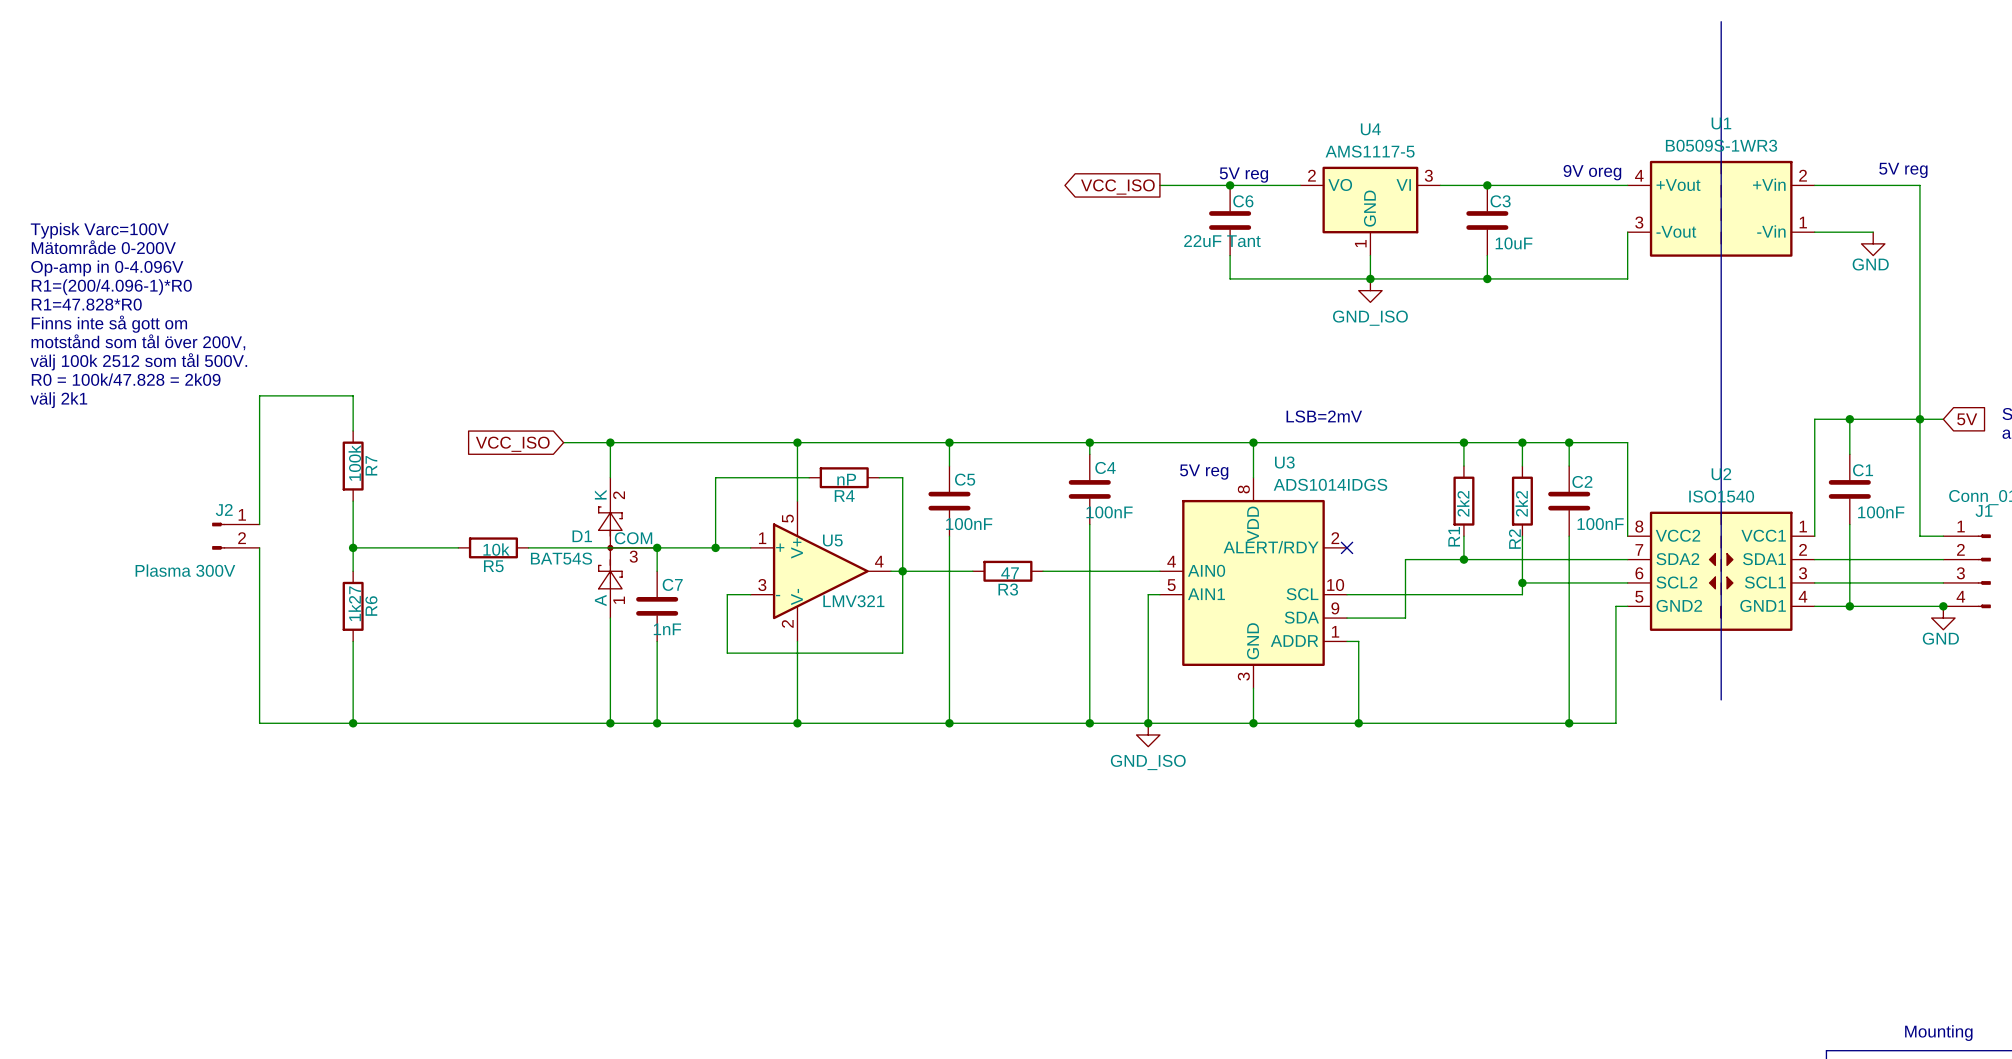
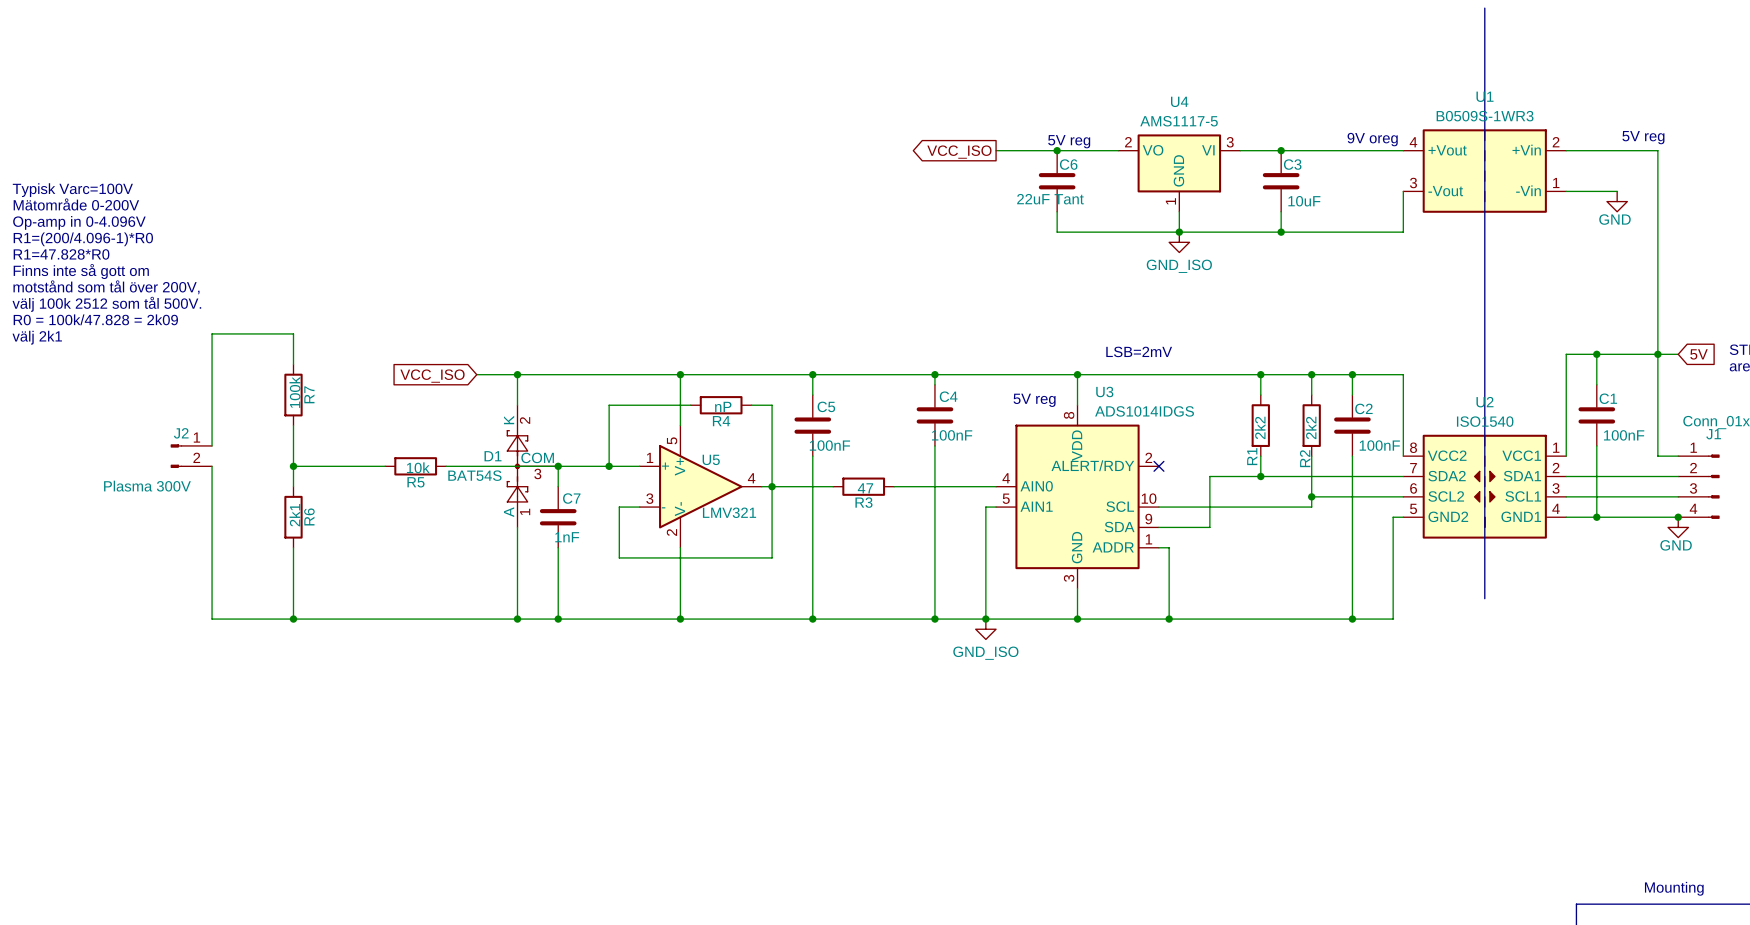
R6 value: 1k27 (354, 603) -> 2k1 (294, 515)

